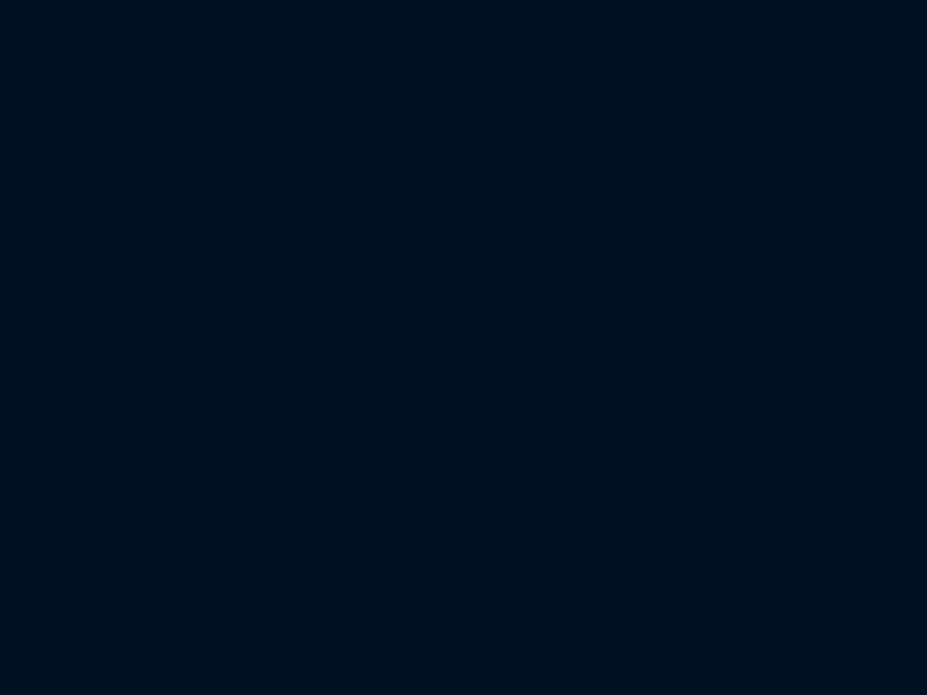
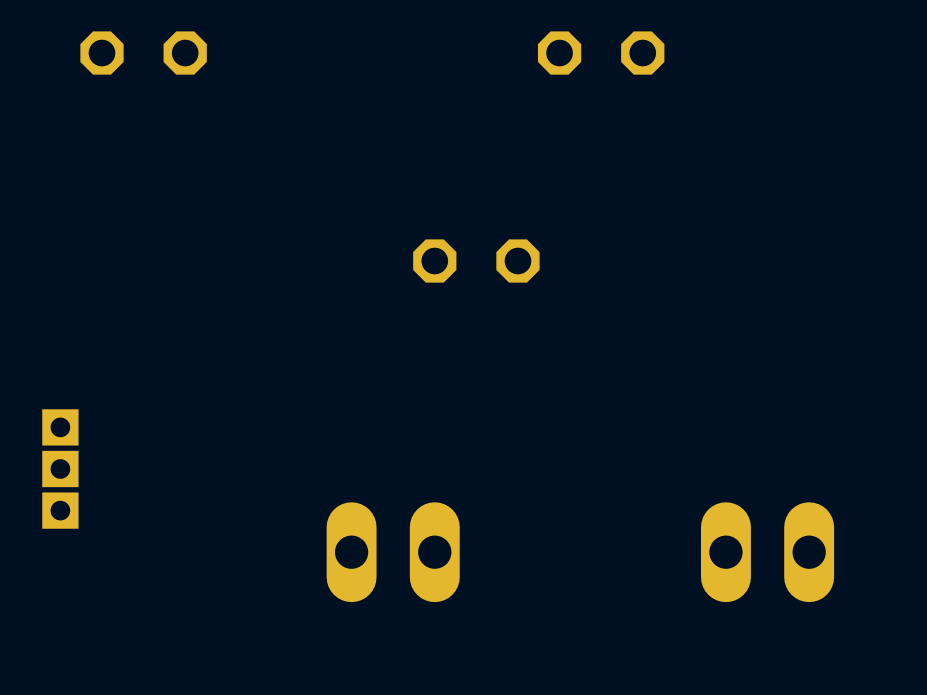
part: none -> (143, 53)
part: none -> (601, 53)
part: none -> (476, 261)
part: none -> (60, 469)
part: none -> (393, 552)
part: none -> (767, 552)

